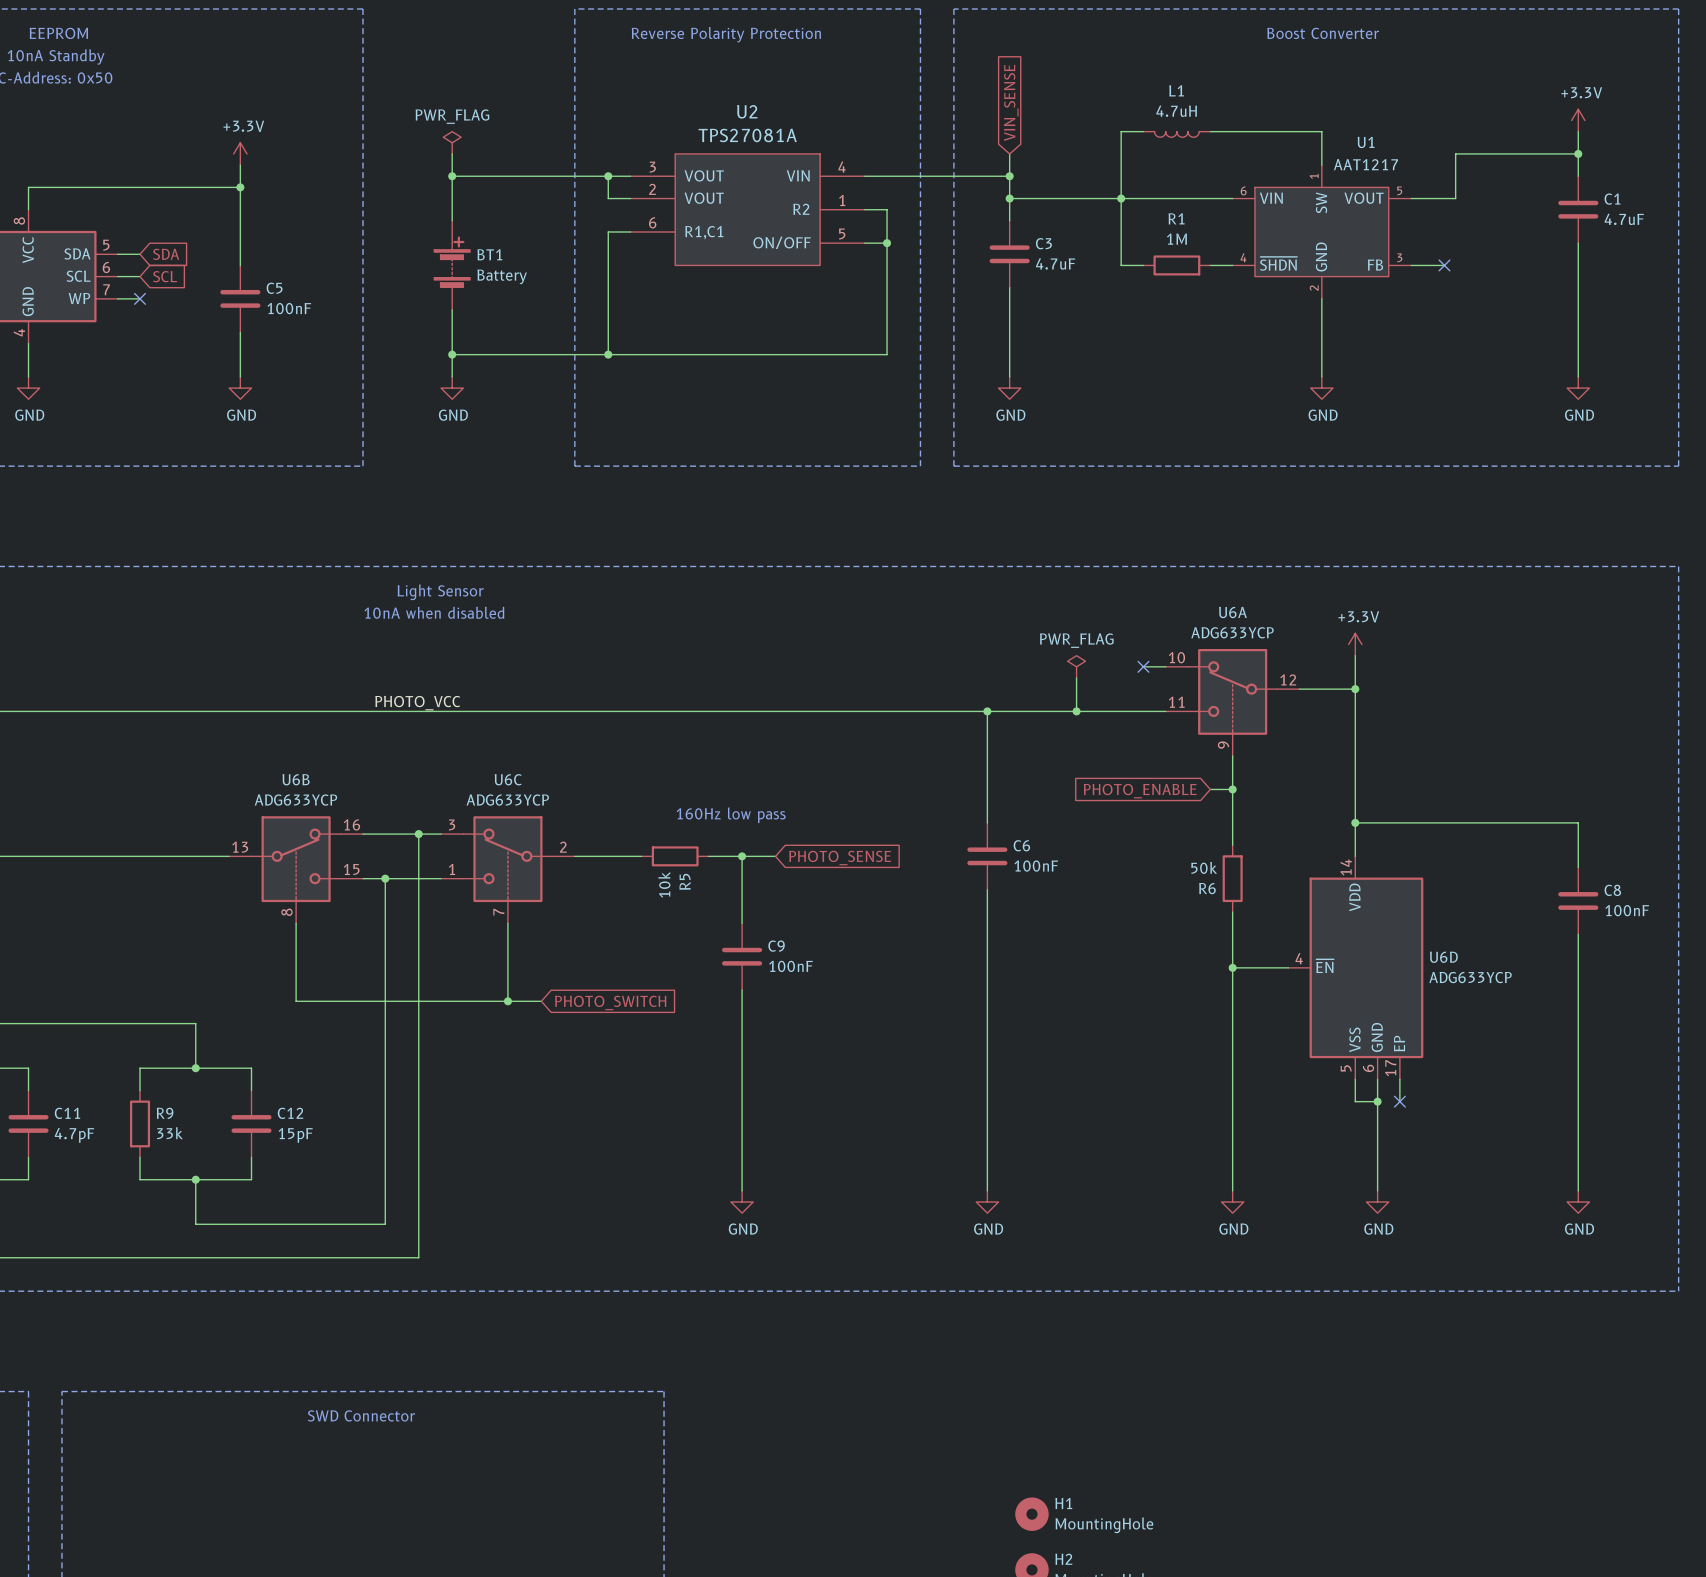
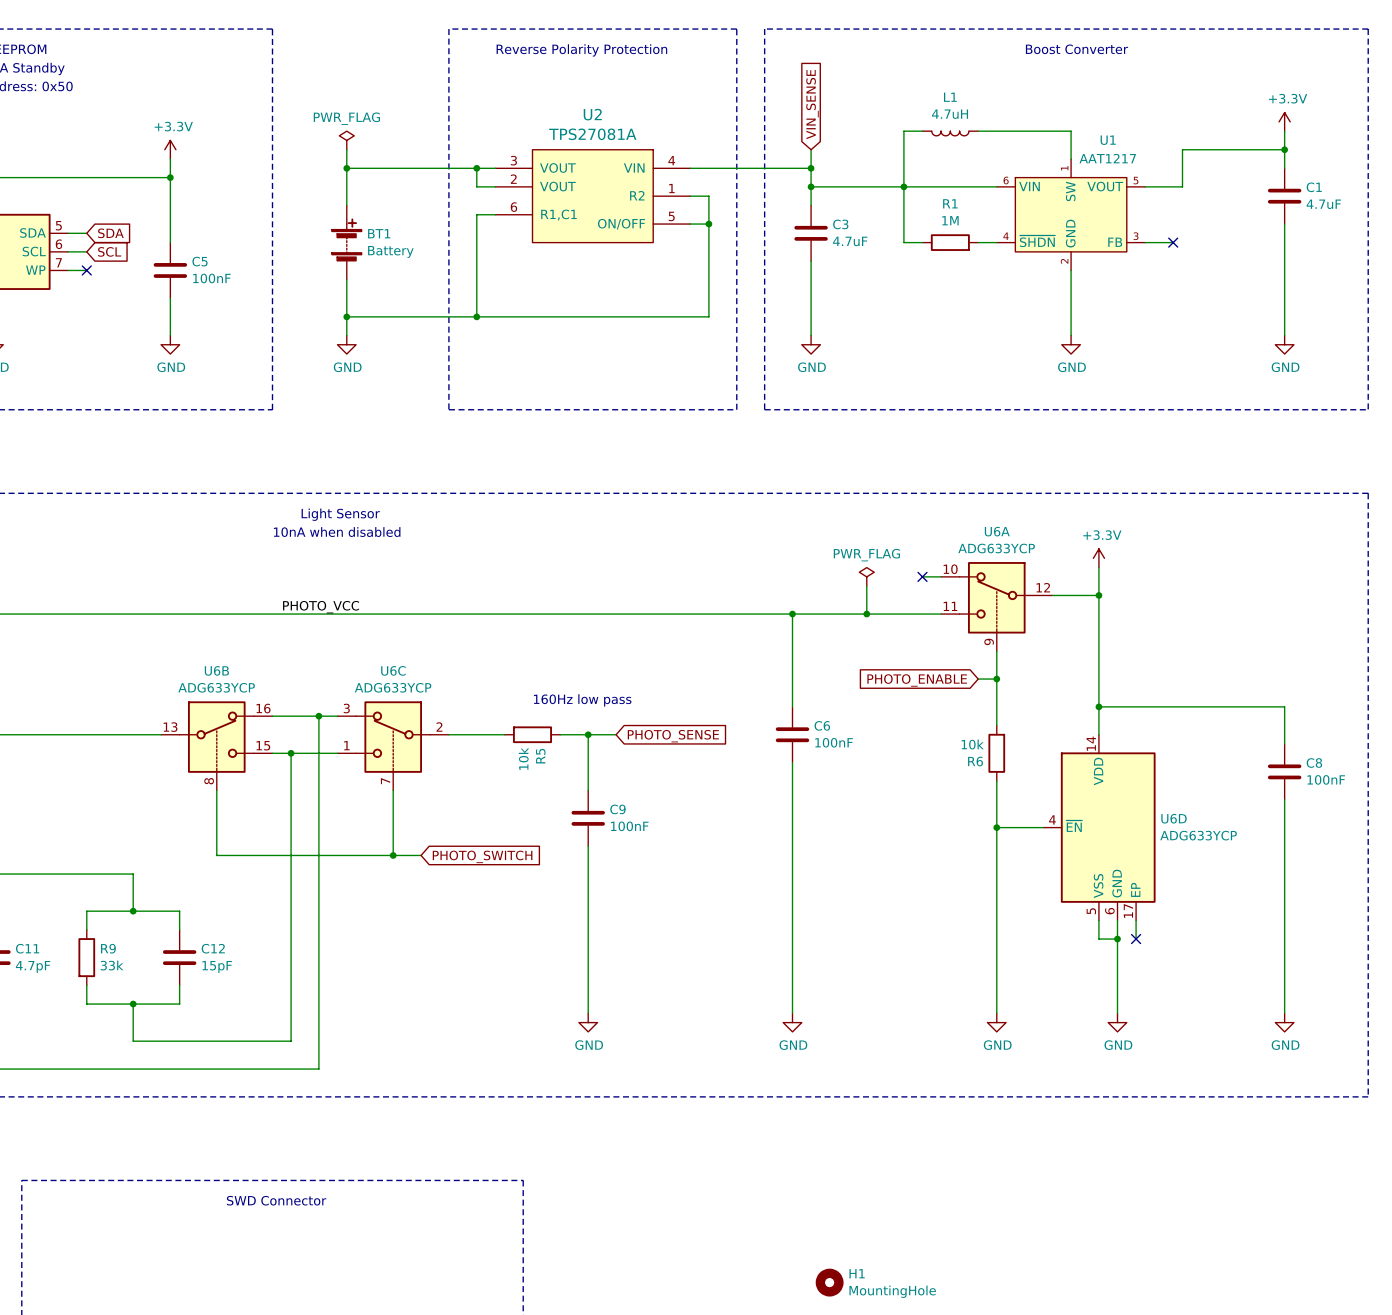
R6 value: 50k (1204, 867) -> 10k (972, 744)

